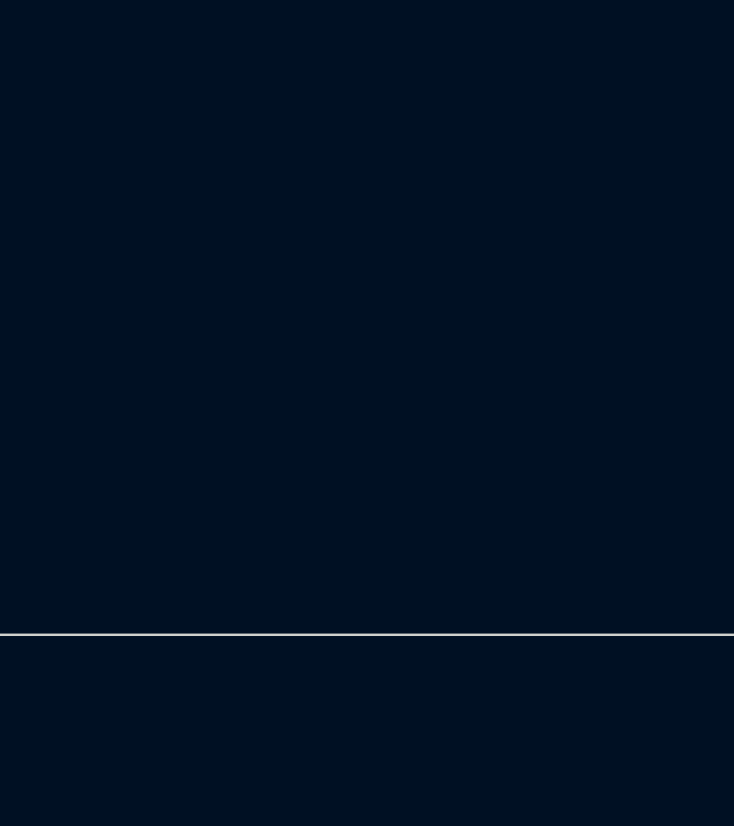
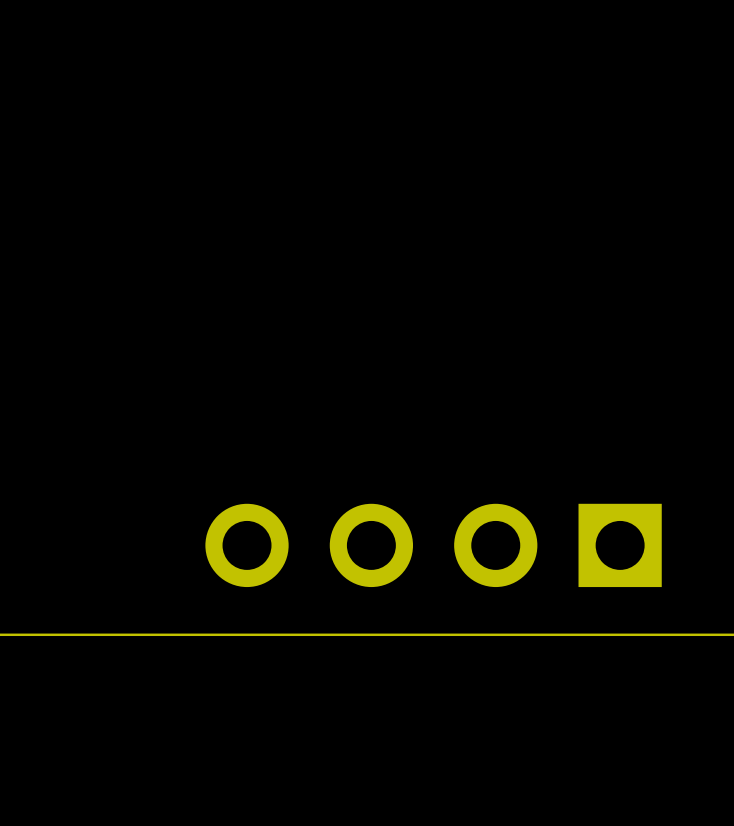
part: none -> (433, 545)

